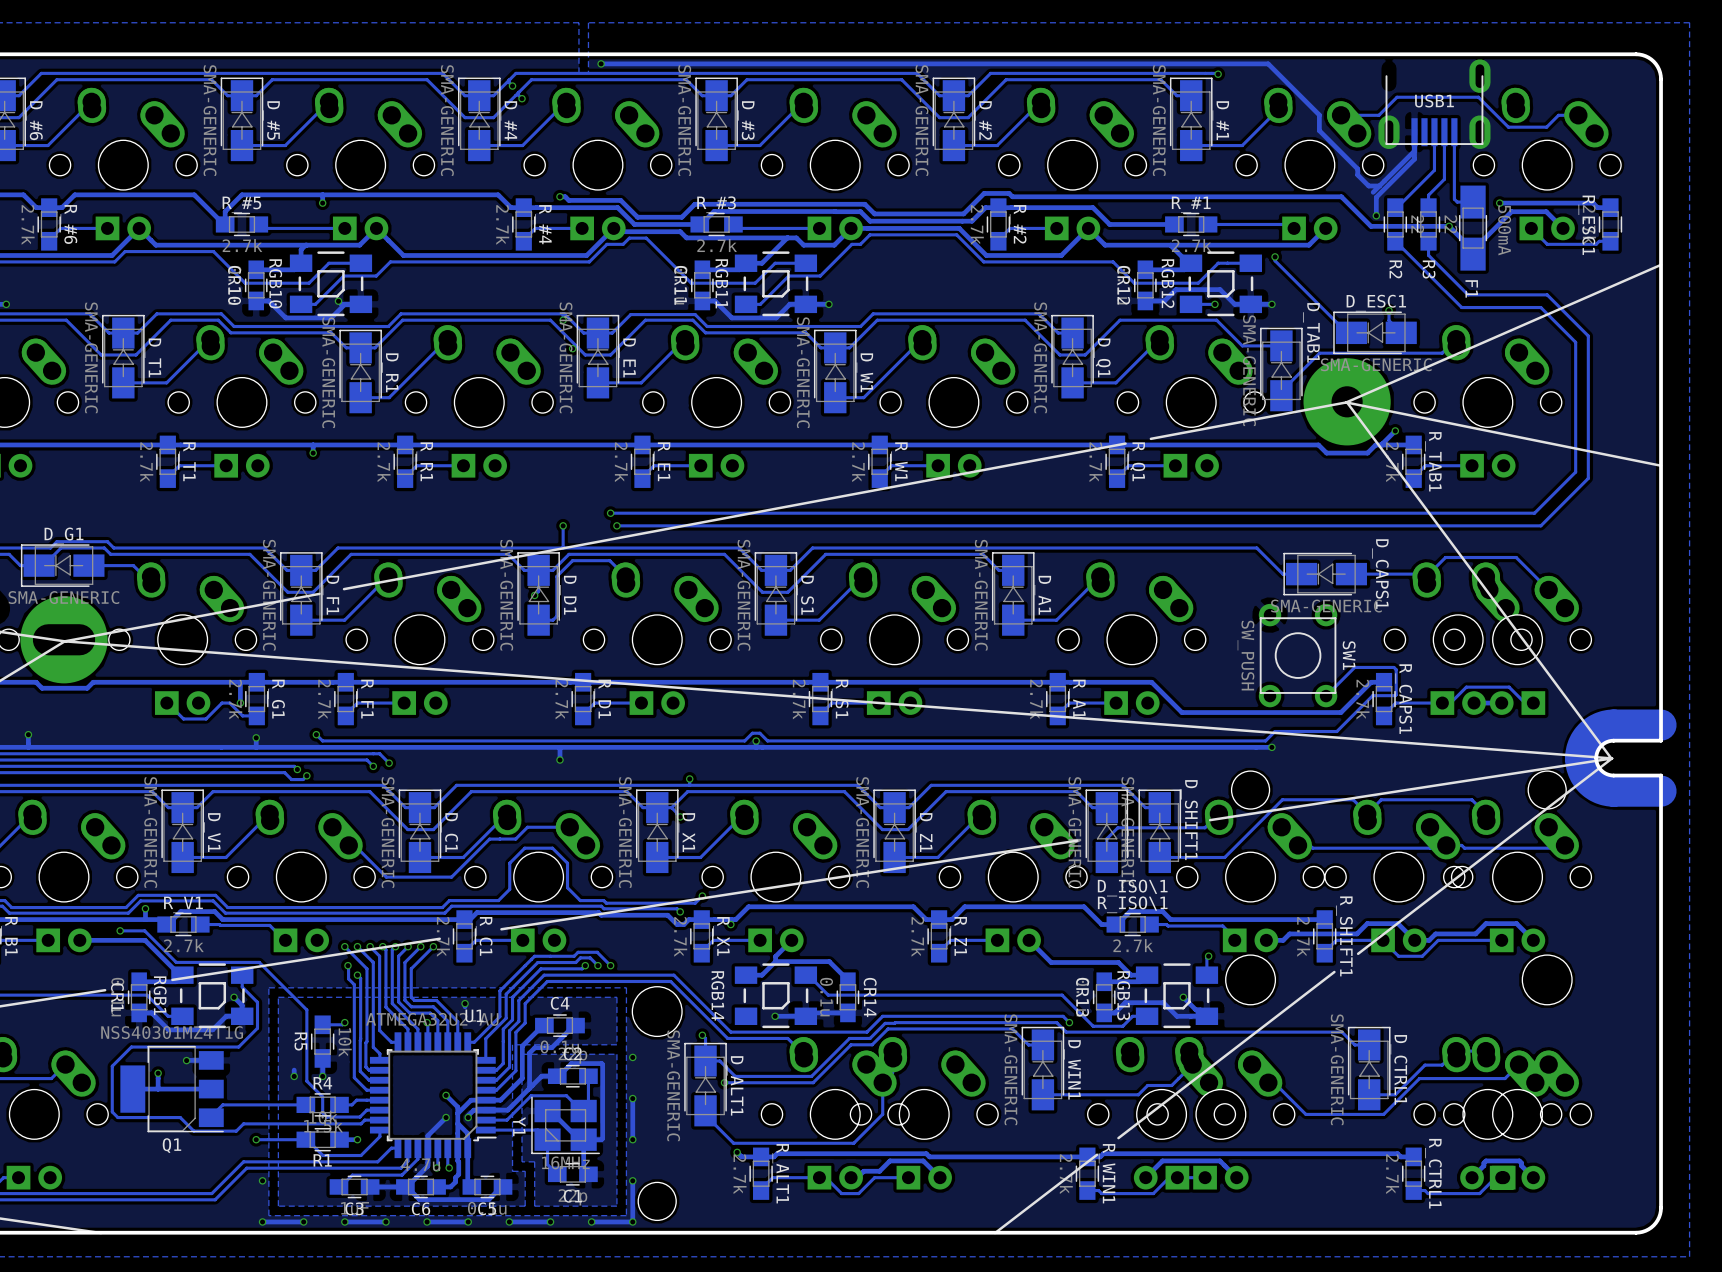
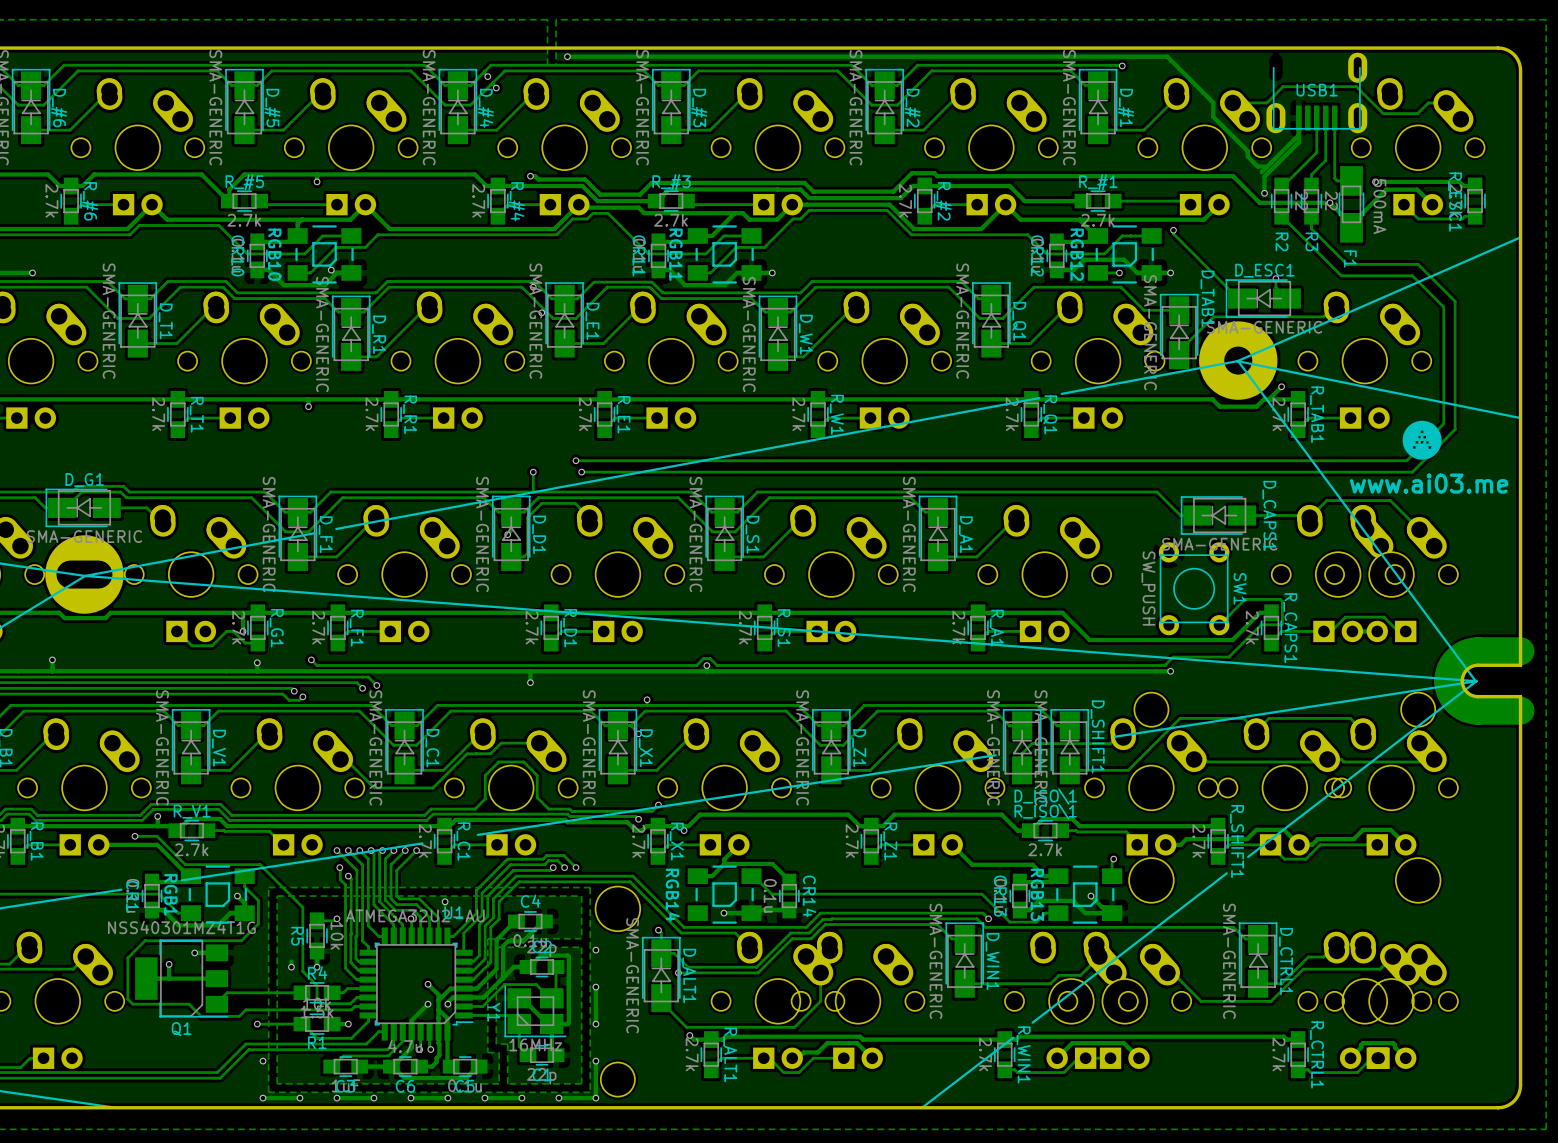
drawing: none -> [1402, 420, 1442, 460]
text: none -> www.ai03.me (1429, 483)

